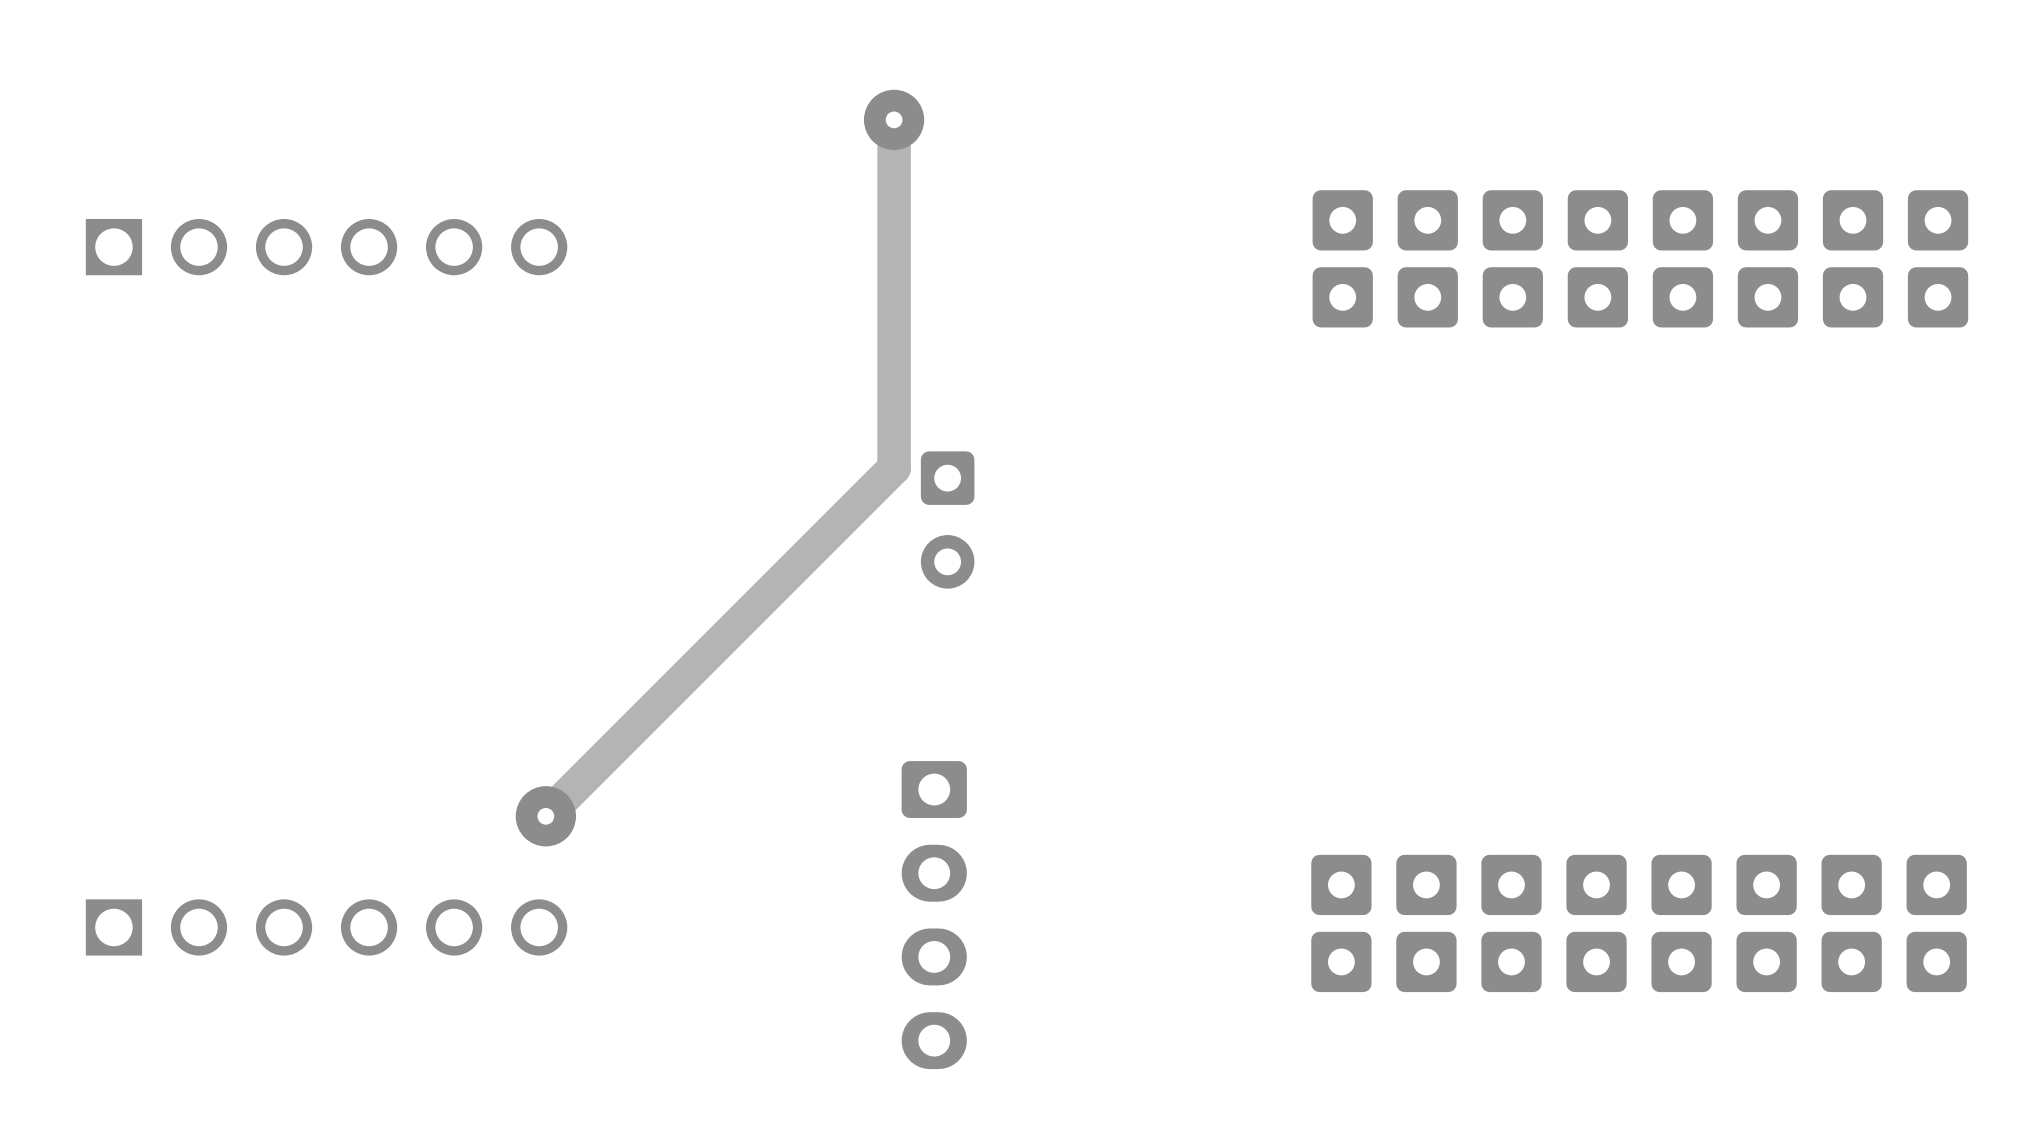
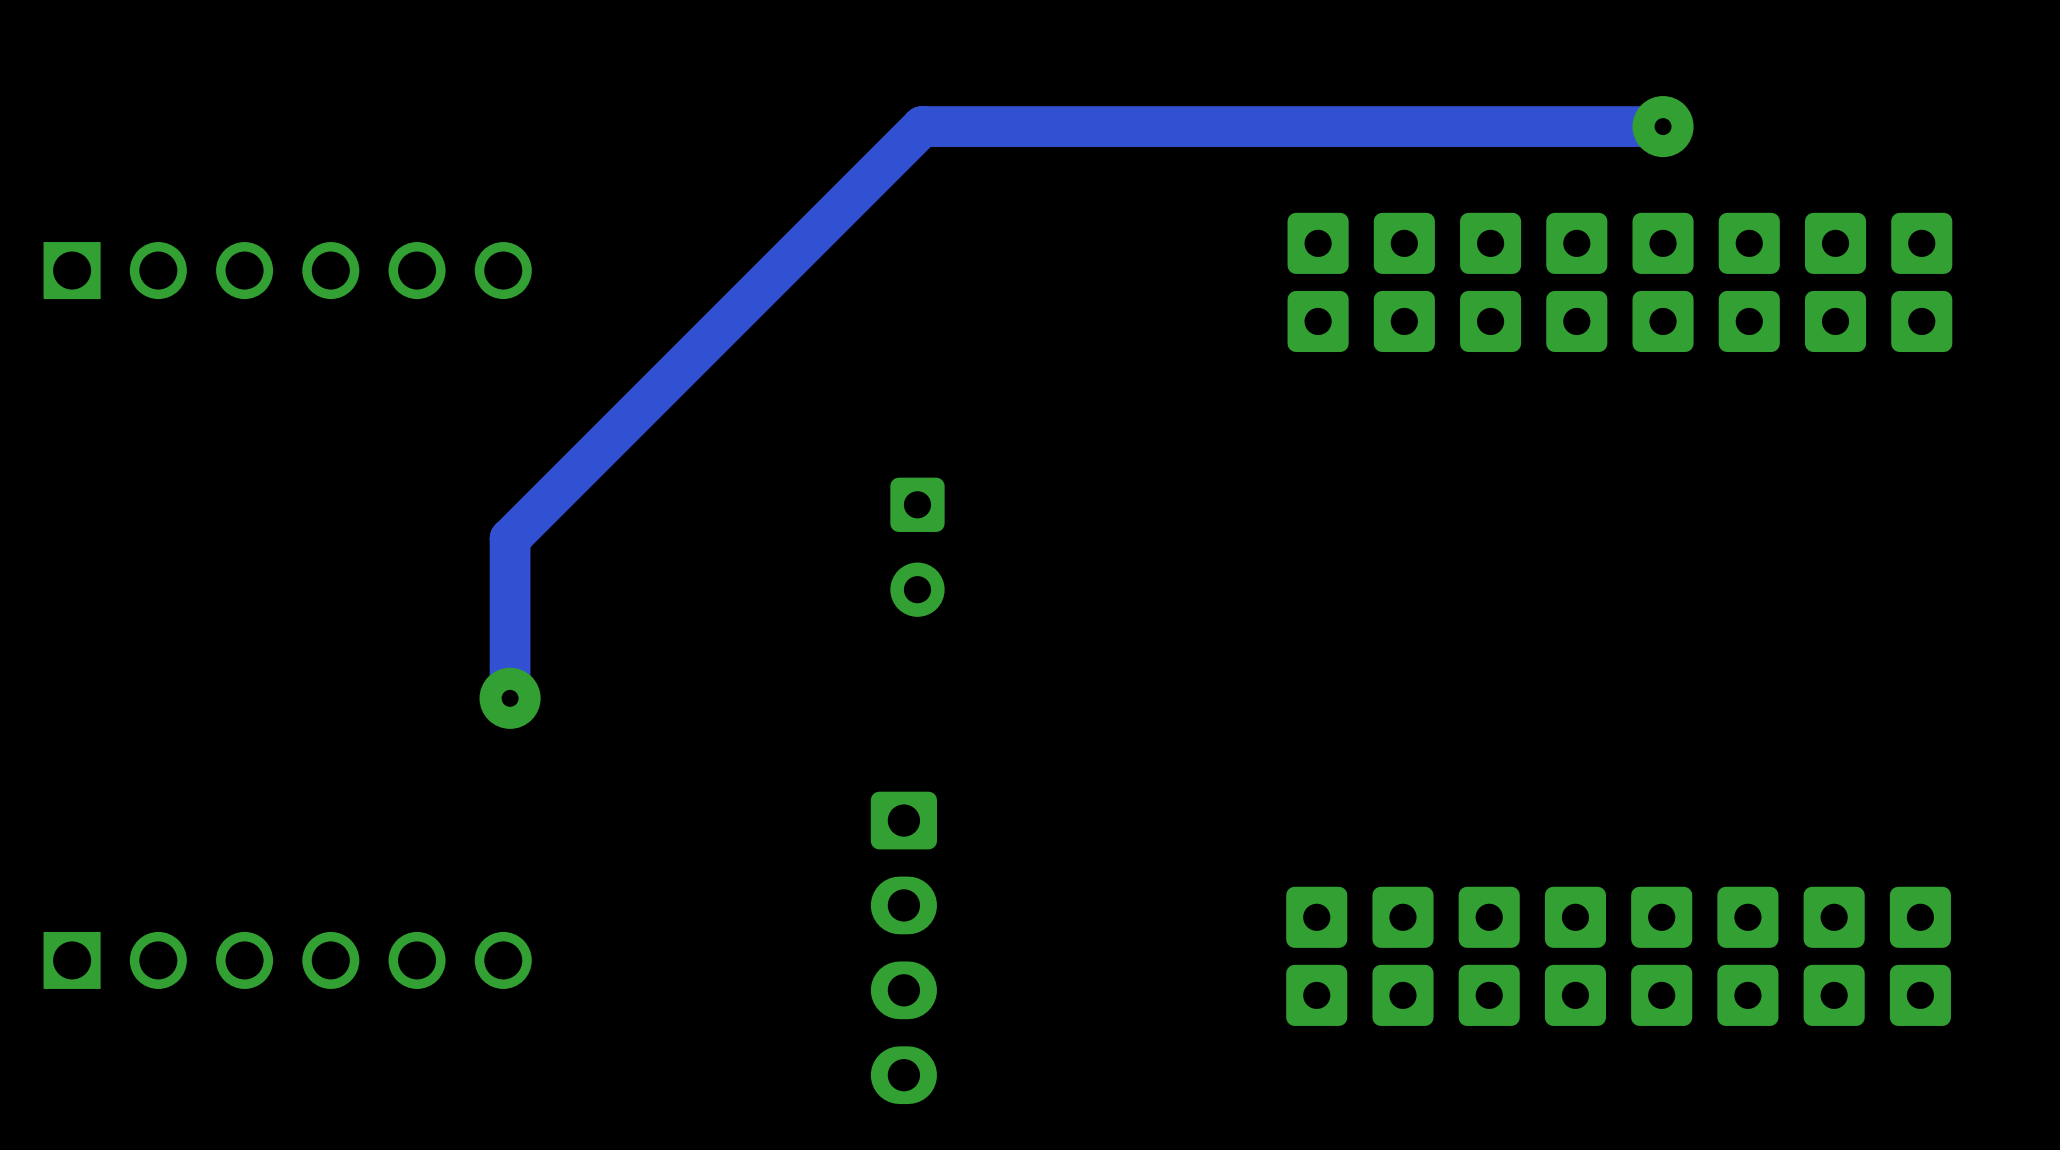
track: none -> (1663, 126) (922, 126) (510, 538) (510, 698)
via: none -> (1663, 126)
track: (894, 119) (894, 468) (545, 816) -> none
via: (894, 119) -> none
via position: (545, 816) -> (510, 698)

